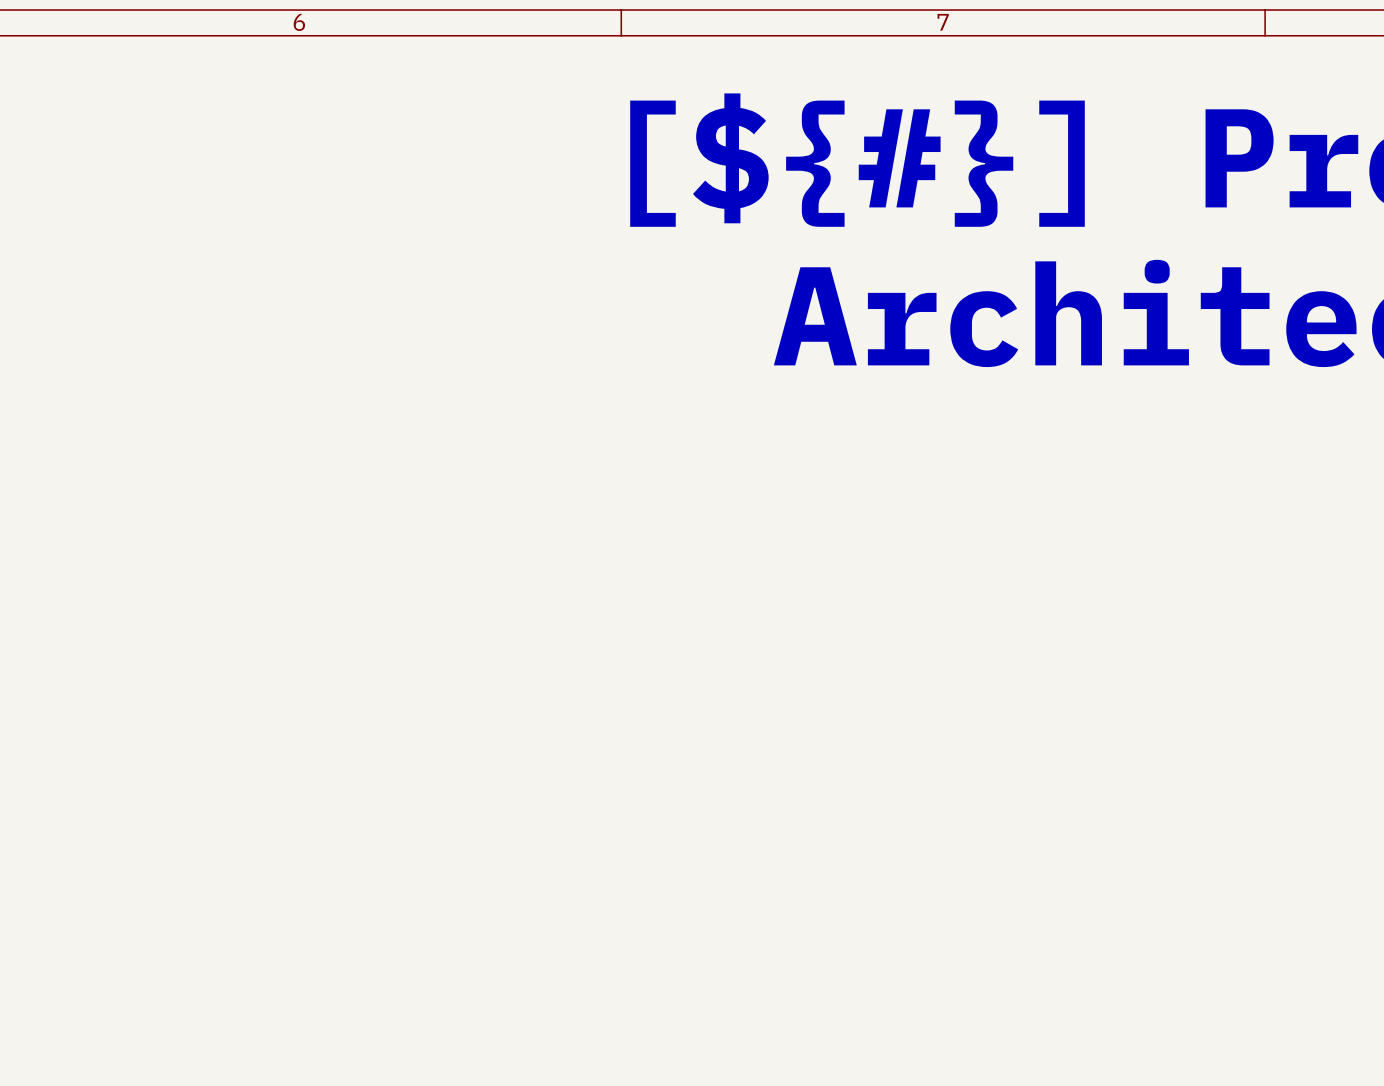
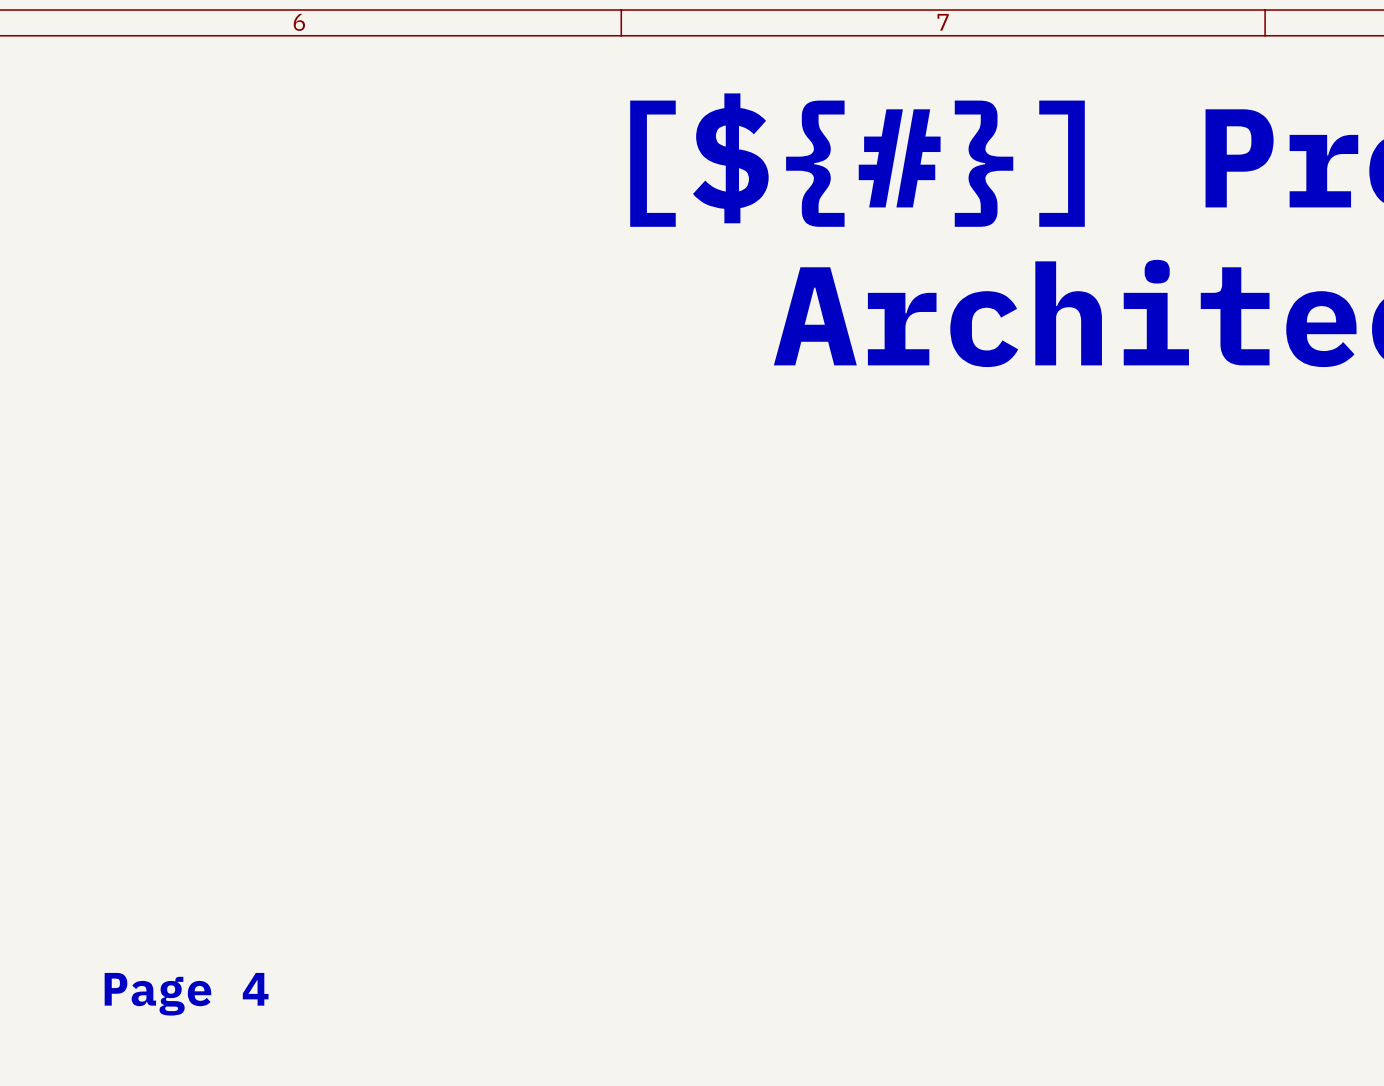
text: none -> Page 4 (186, 994)

